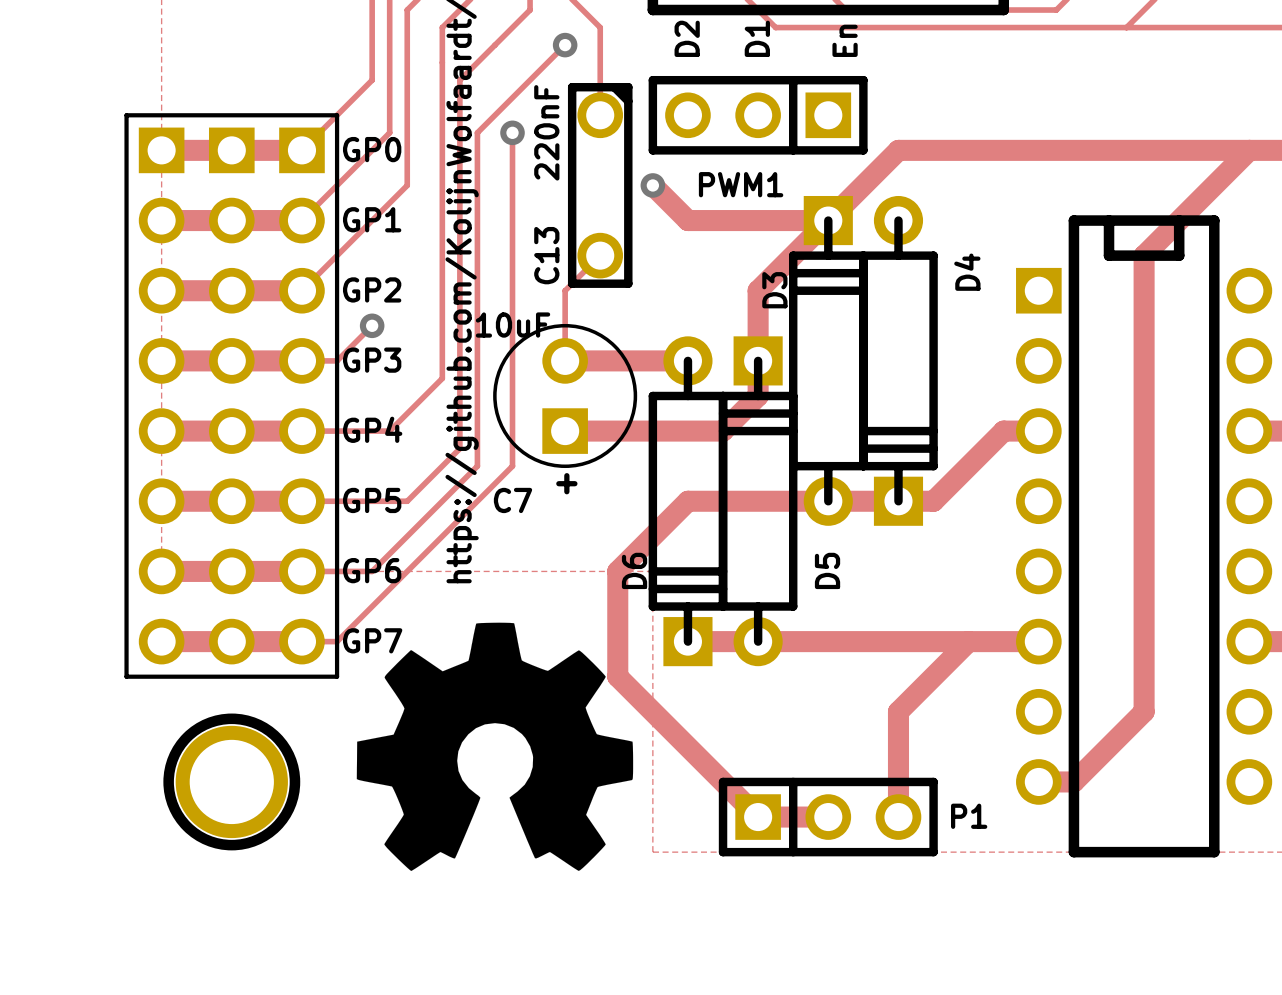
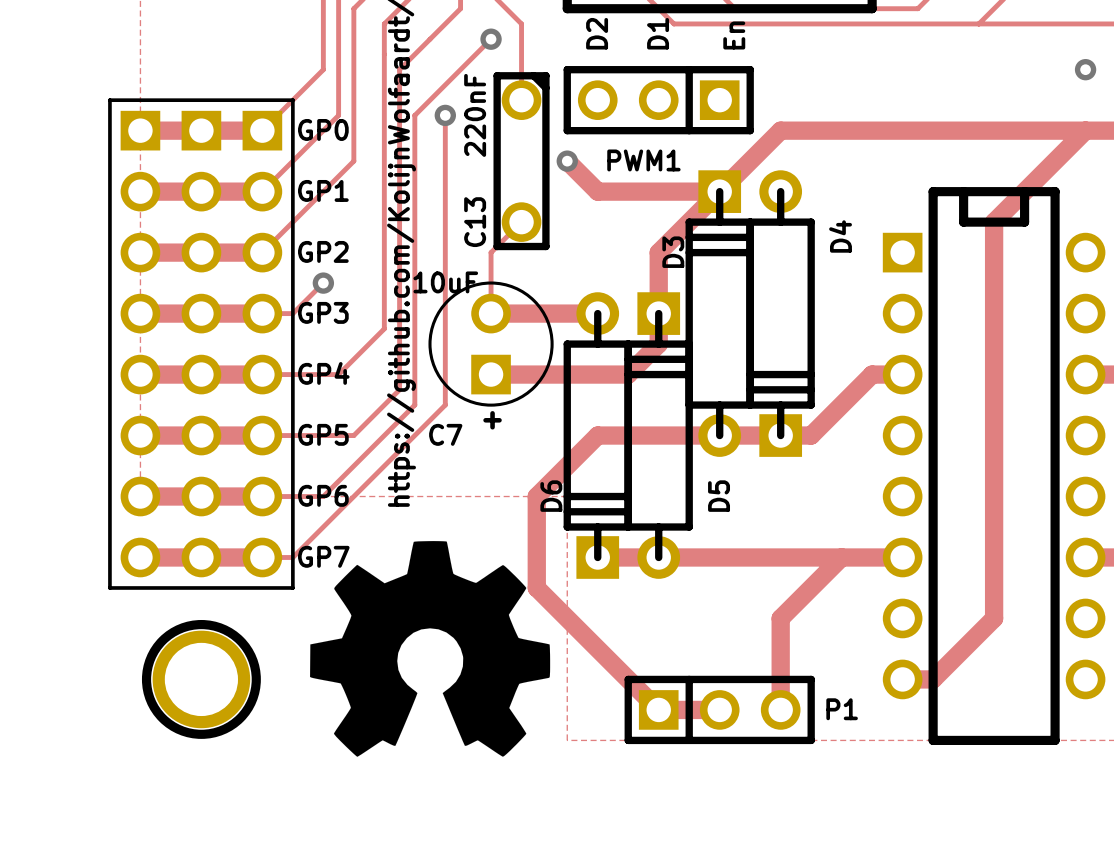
via: none -> (1085, 69)

